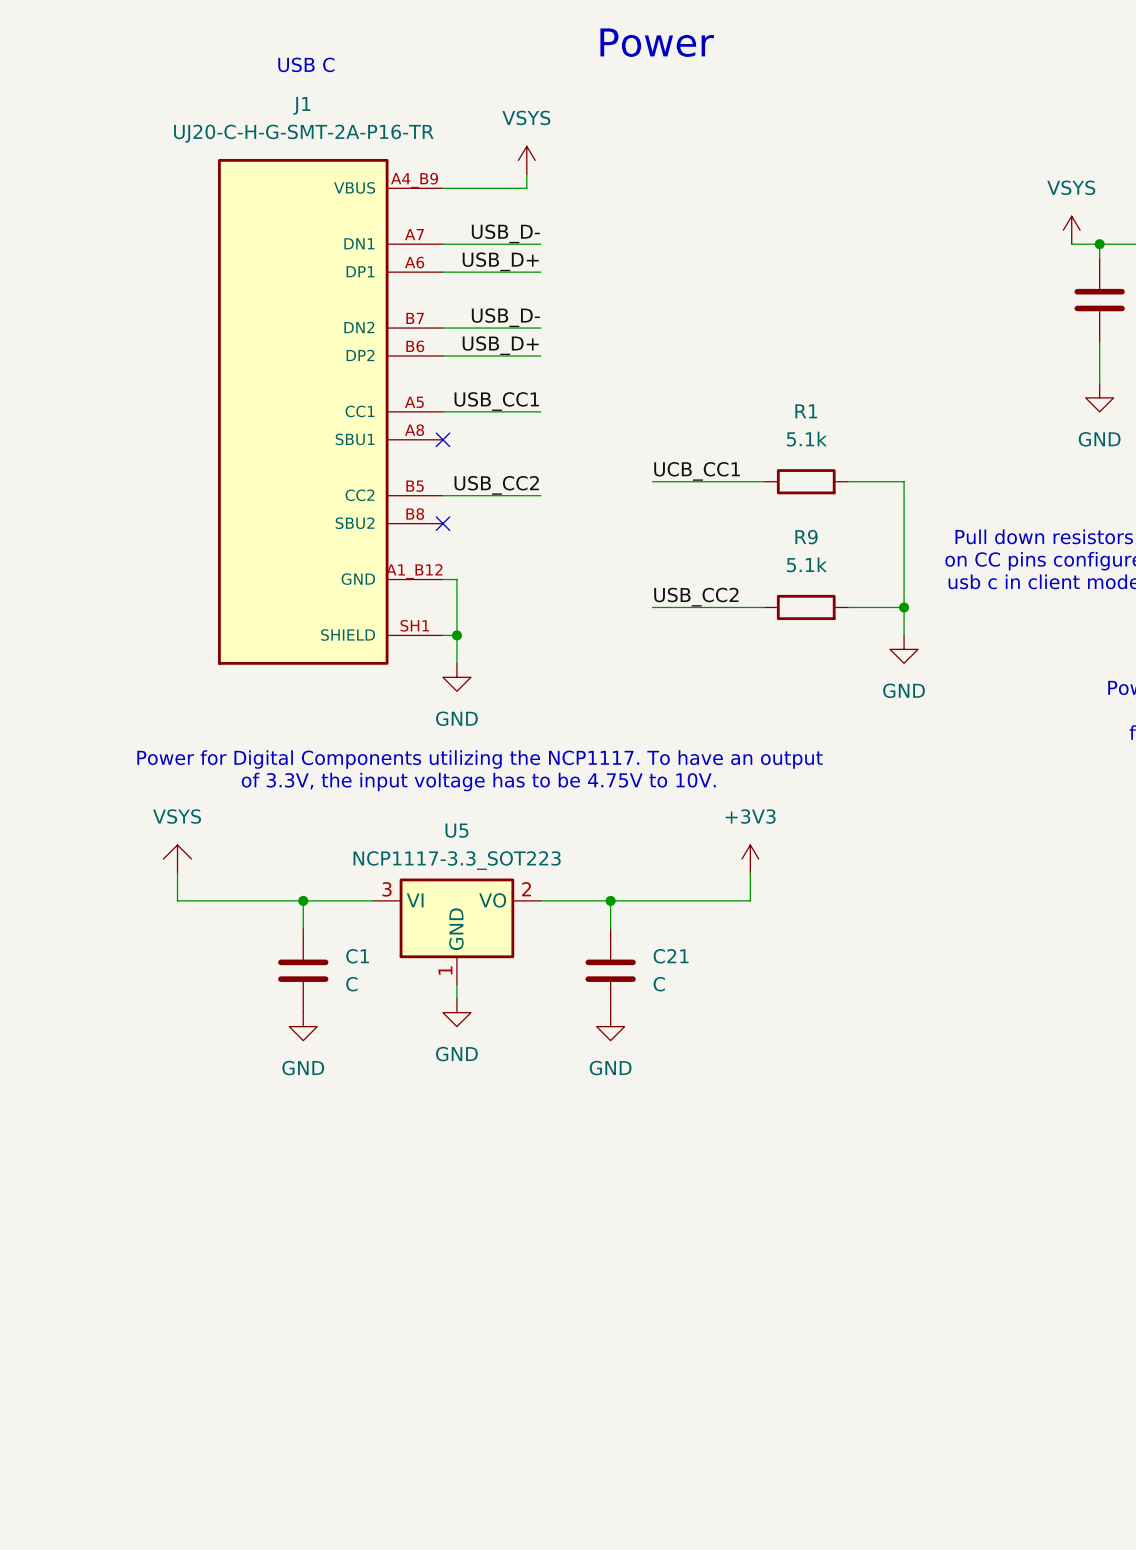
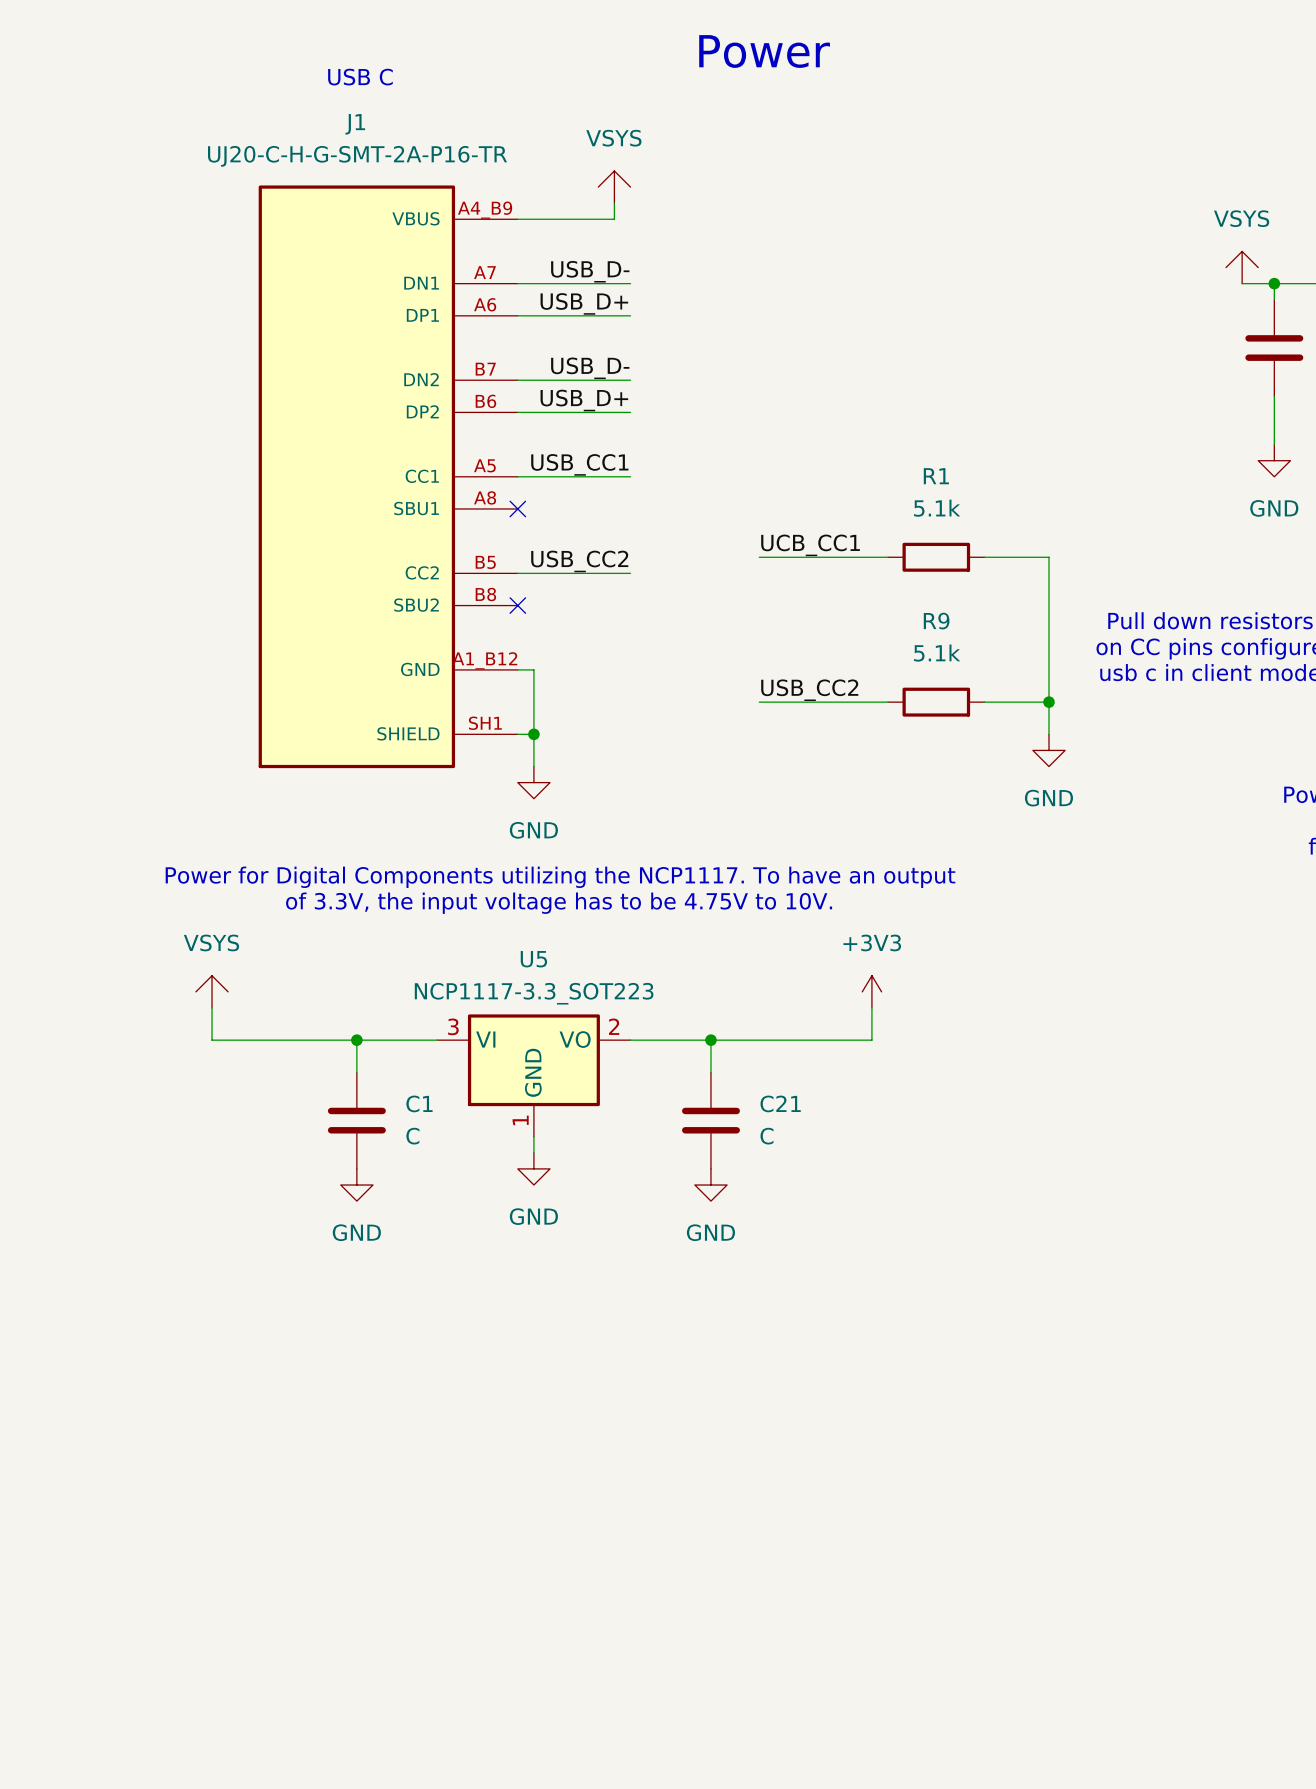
power symbol shape: [518, 146, 536, 175] -> [598, 170, 631, 204]
power symbol shape: [1063, 216, 1081, 245] -> [1226, 251, 1259, 284]

